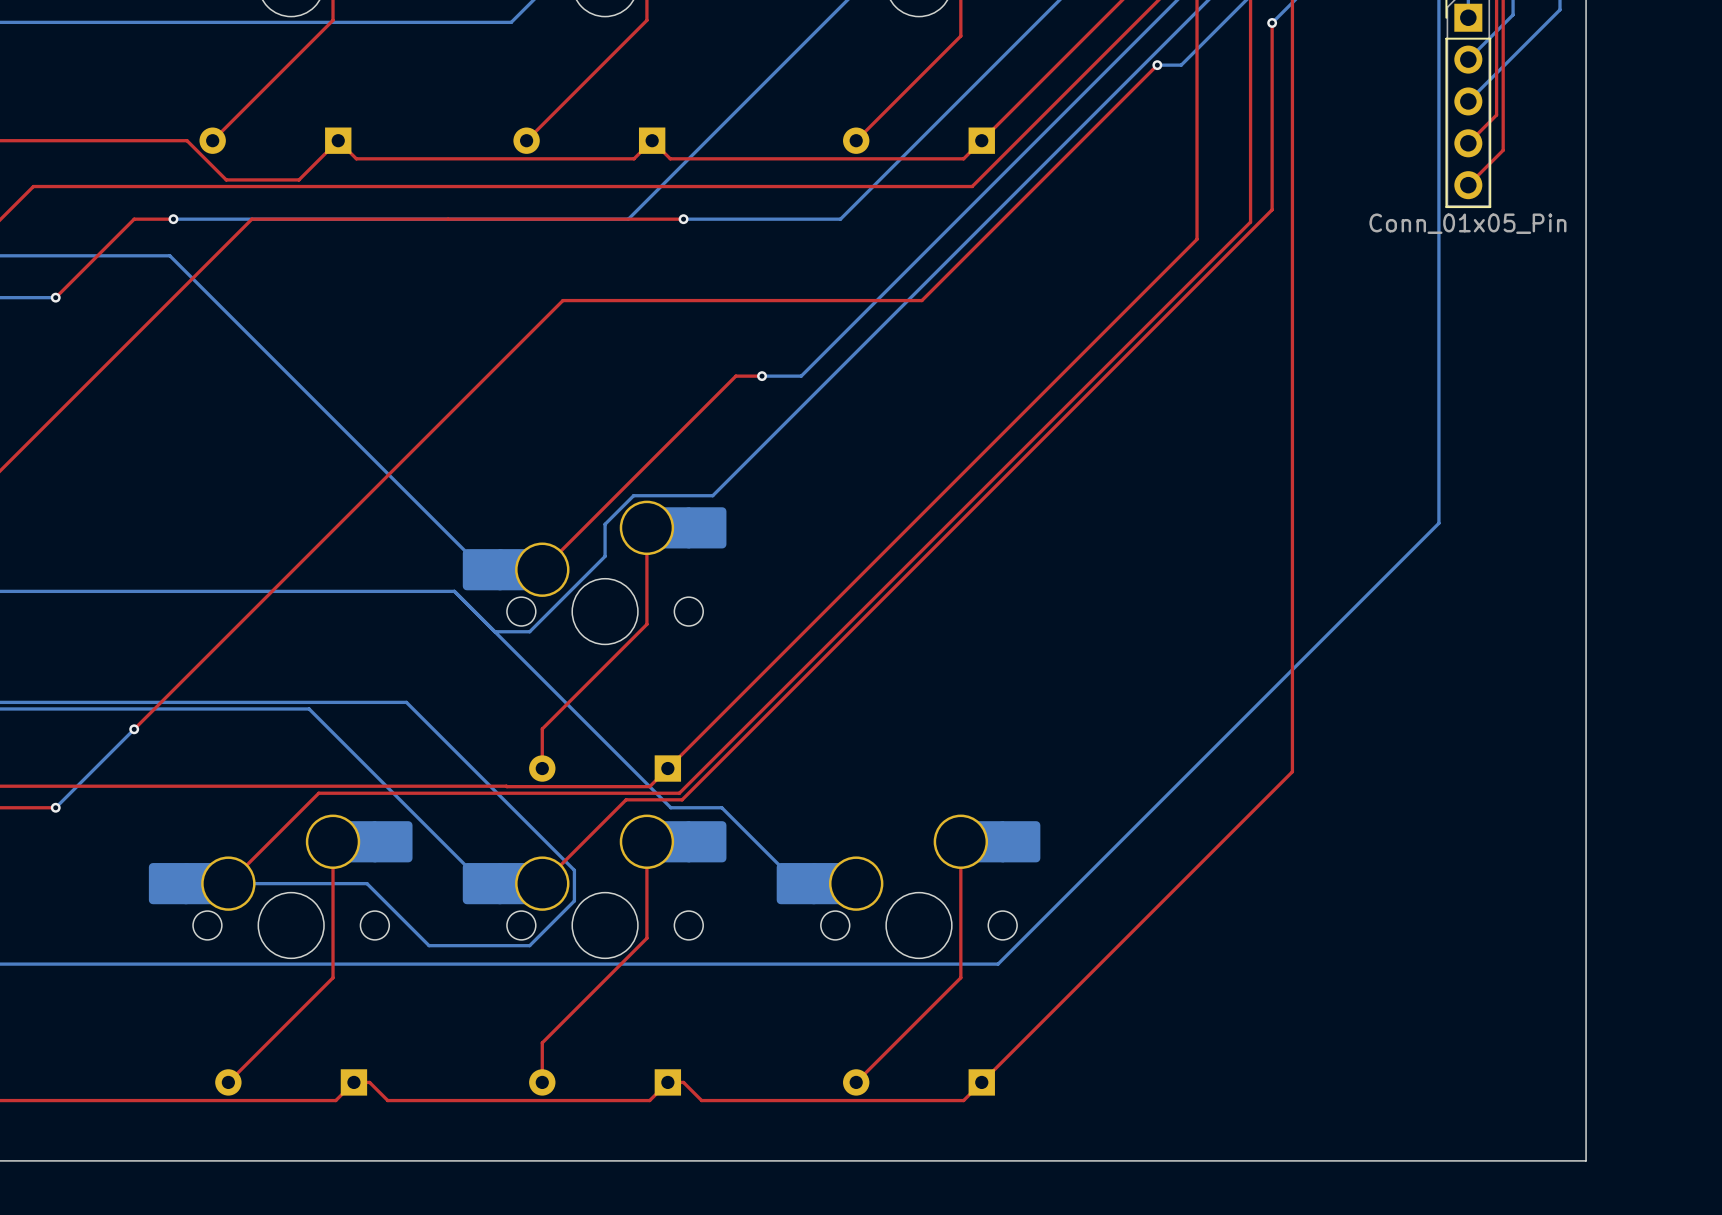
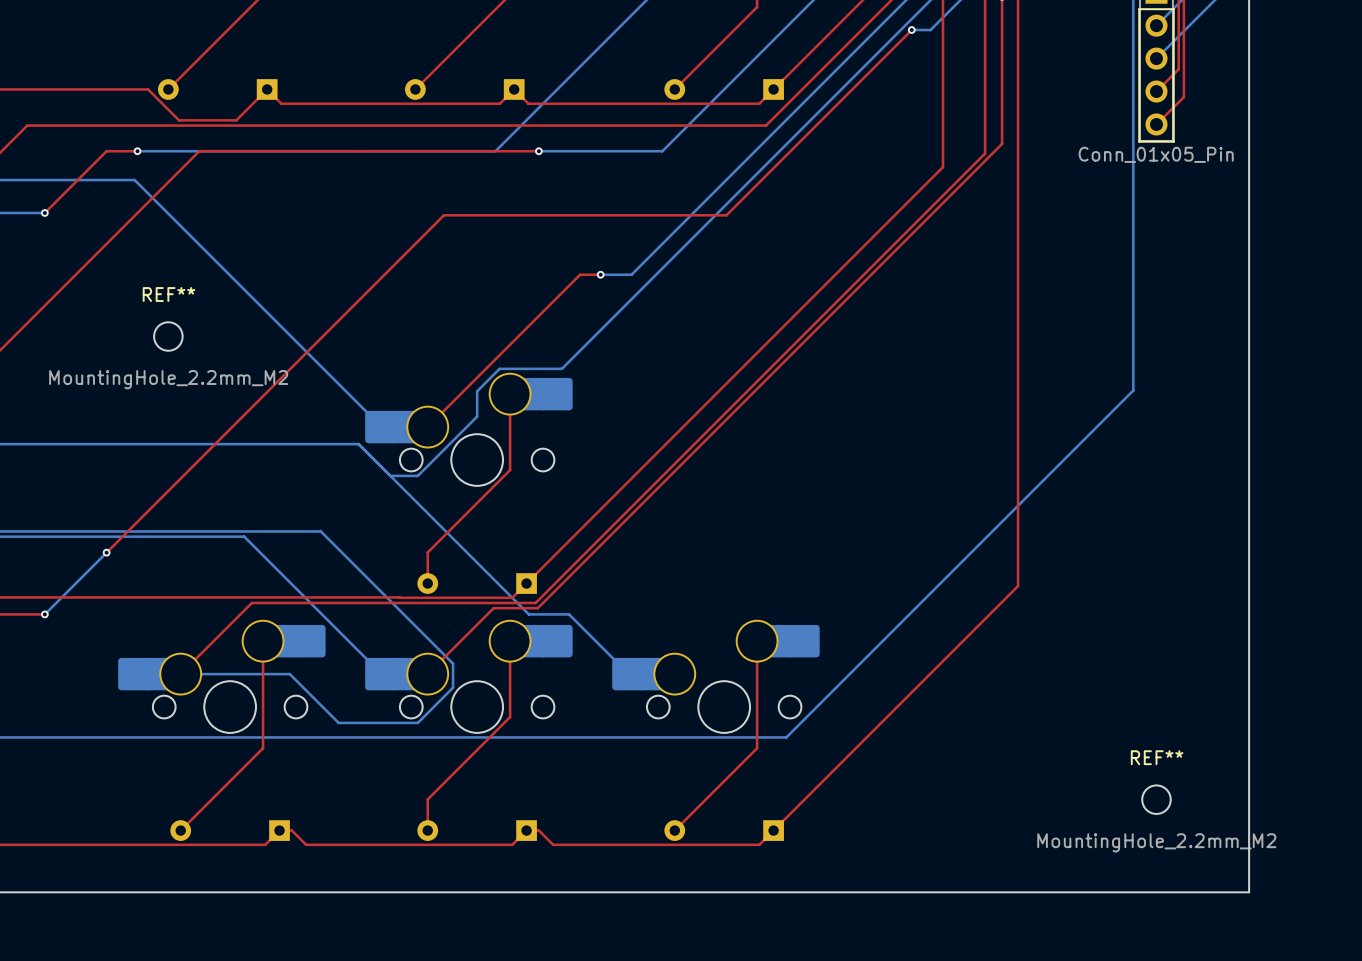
REF**: none -> MountingHole_2.2mm_M2 (168, 336)
REF**: none -> MountingHole_2.2mm_M2 (1156, 799)

